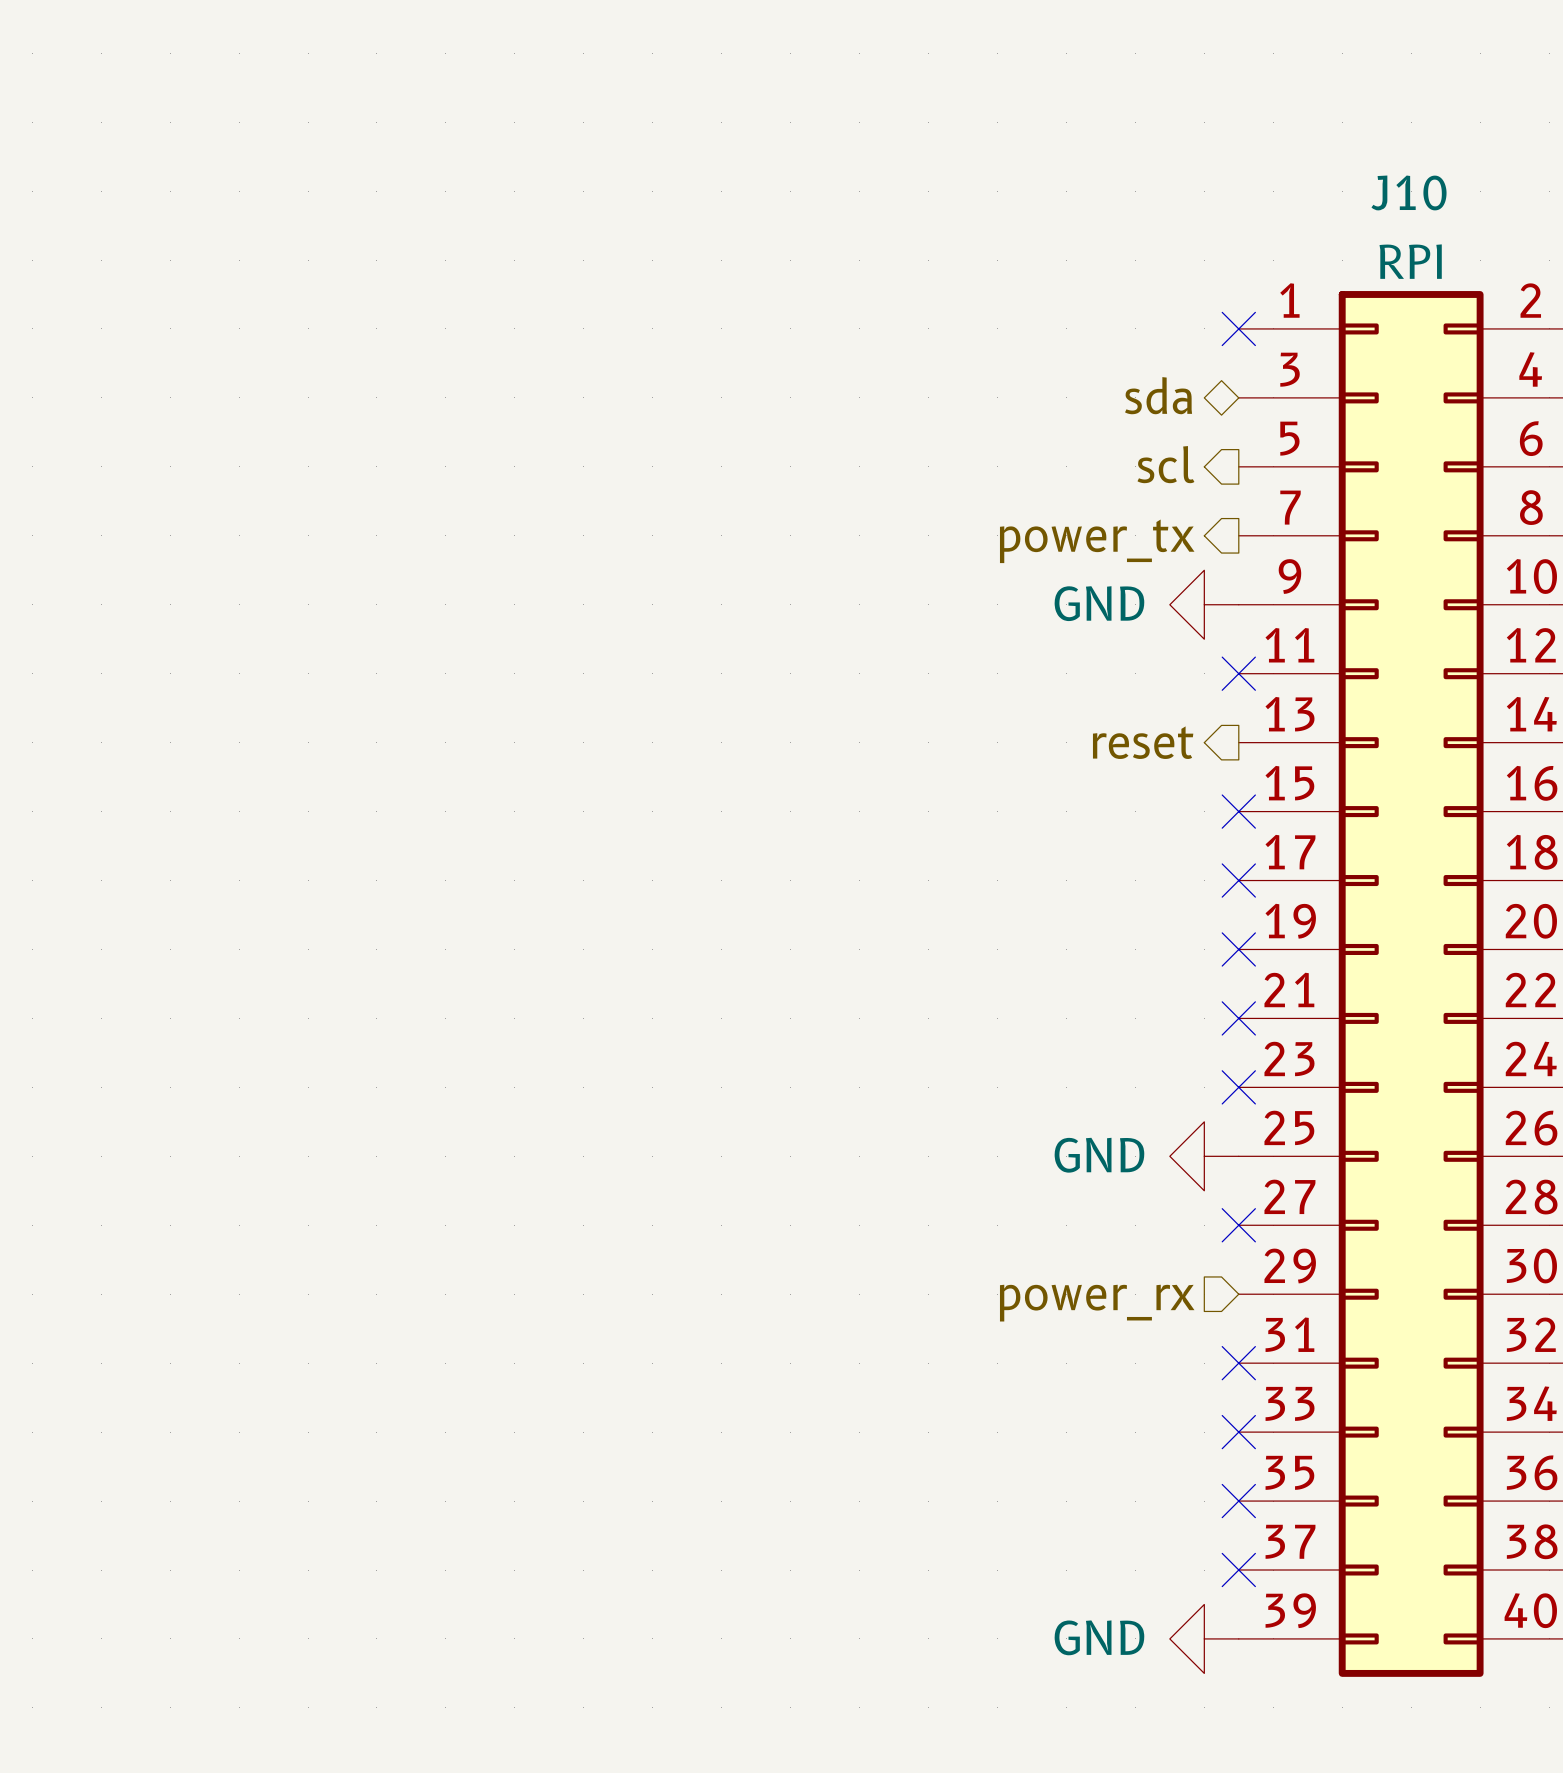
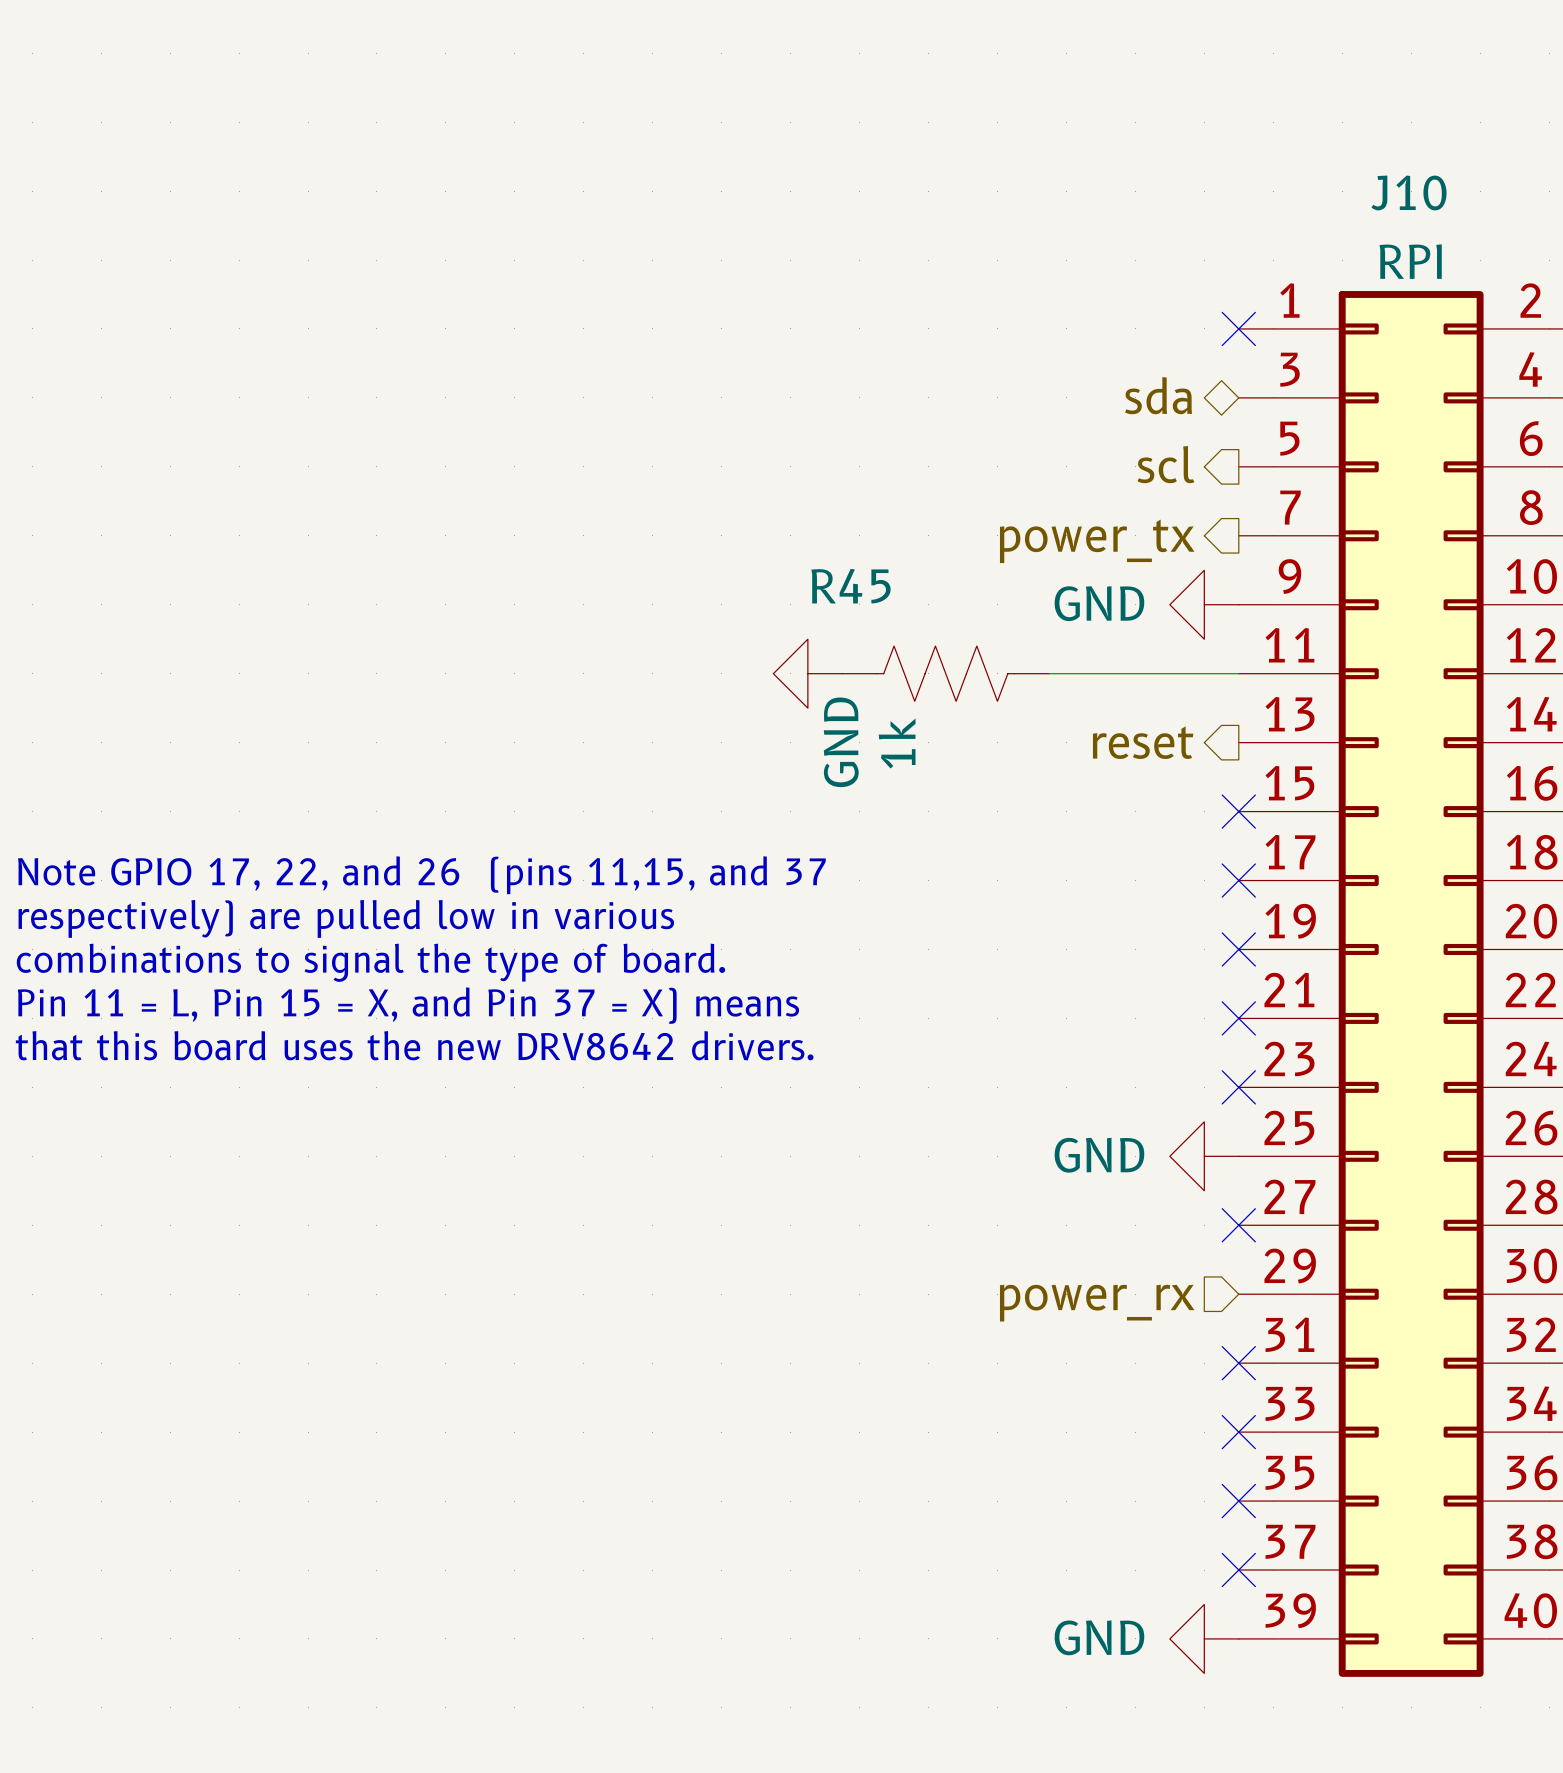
power symbol: none -> GND (807, 673)
R45: none -> 1k (945, 673)
wire: none -> (1049, 673) (1238, 673)
no-connect mark: (1238, 673) -> none
text: none -> Note GPIO 17, 22, and 26 (pins 11,15, and 37 (421, 875)
text: none -> respectively) are pulled low in various (346, 918)
text: none -> combinations to signal the type of board. (370, 962)
text: none -> Pin 11 = L, Pin 15 = X, and Pin 37 = X) means (408, 1005)
text: none -> that this board uses the new DRV8642 drivers. (414, 1045)

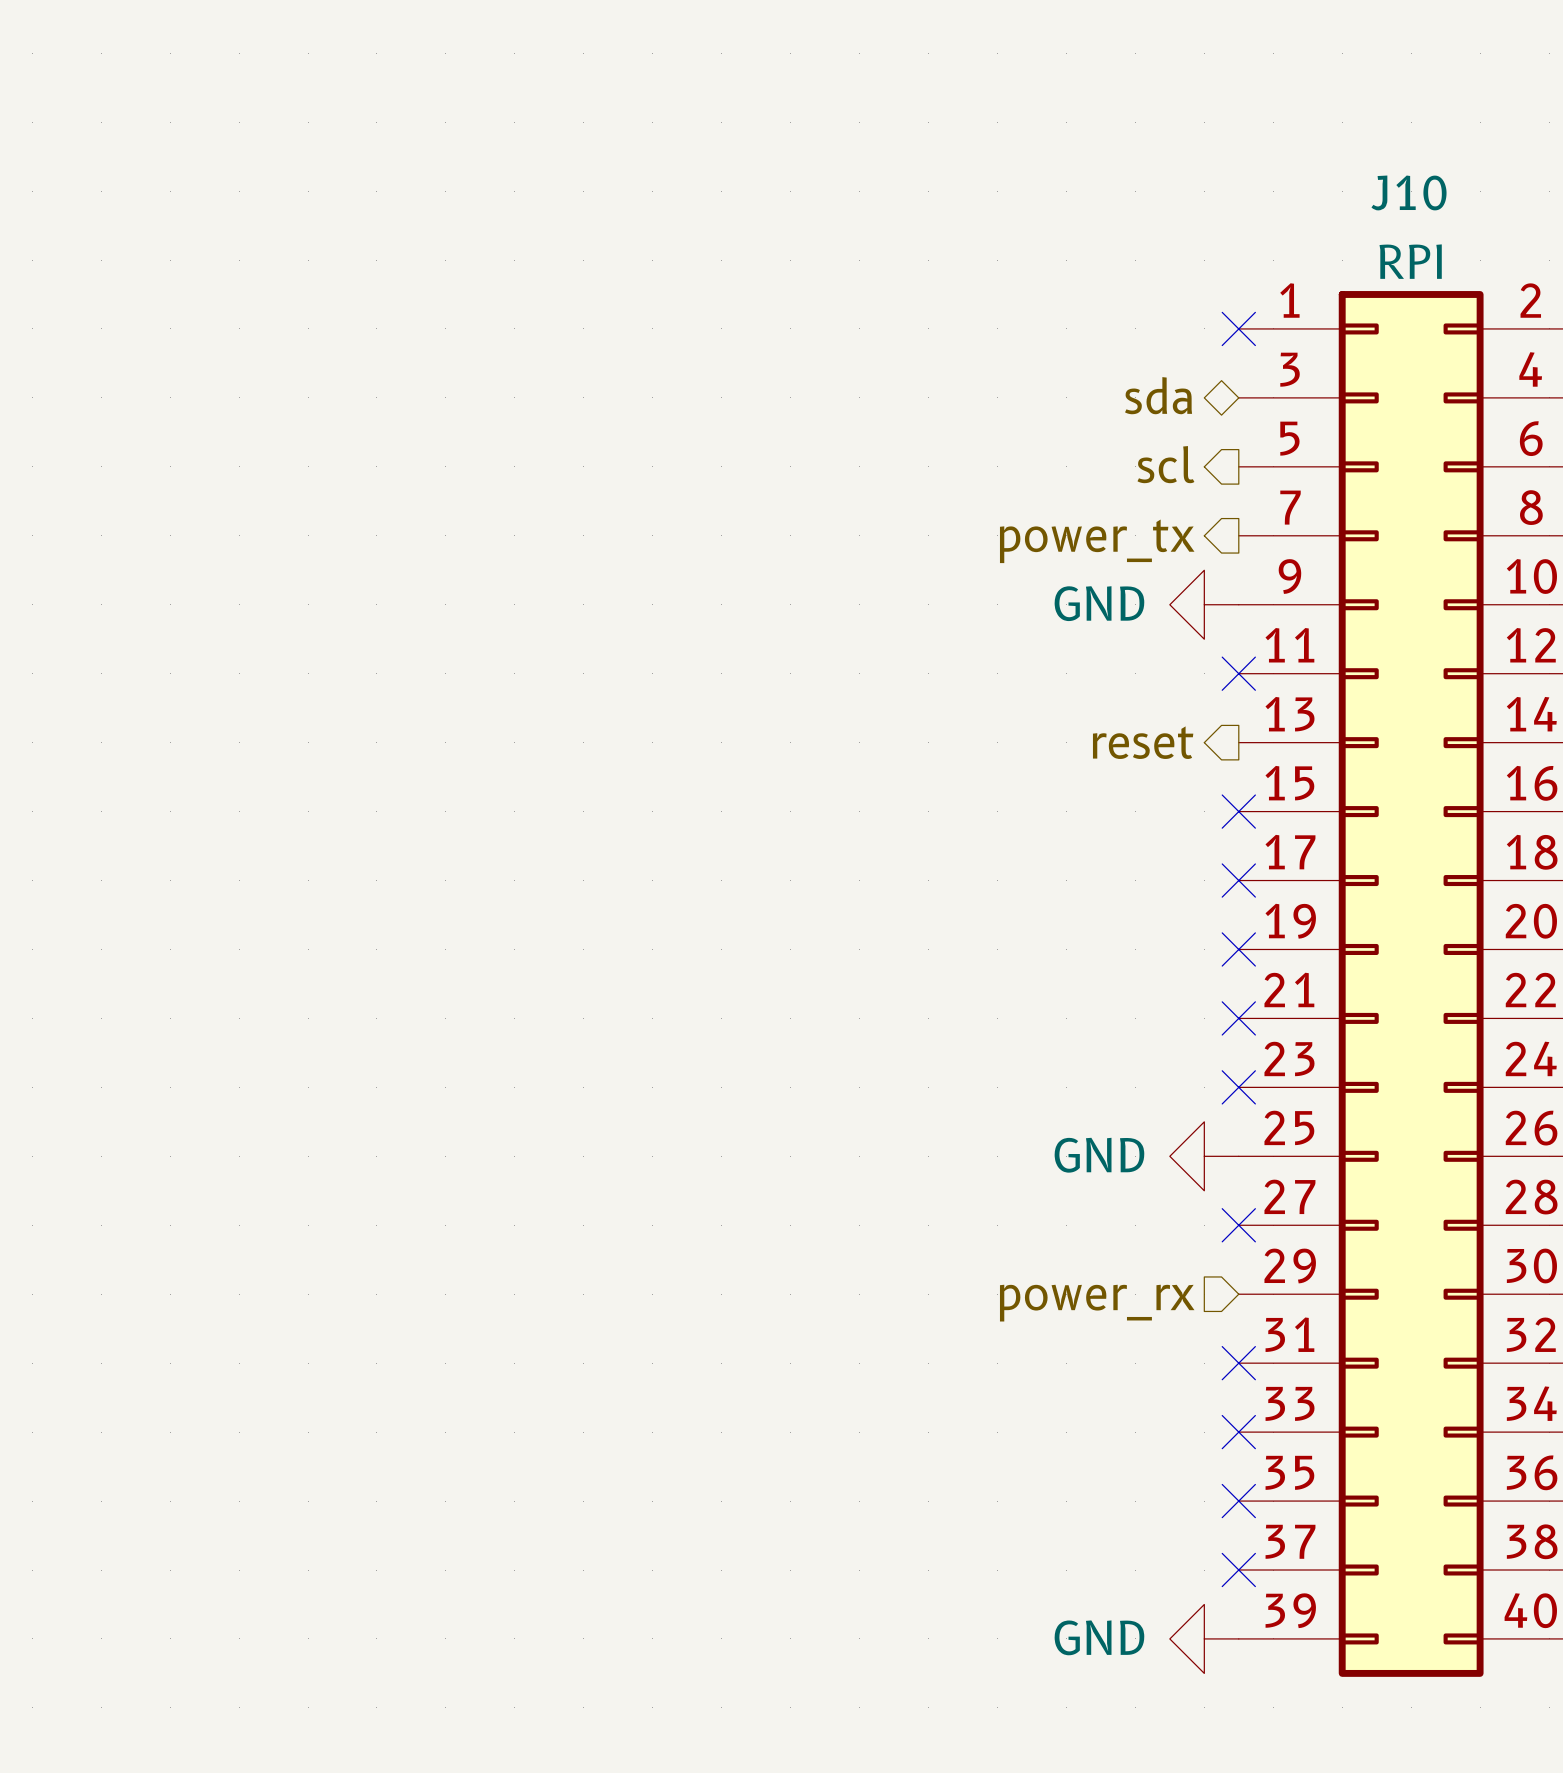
power symbol: GND (807, 673) -> none
R45: 1k (945, 673) -> none
wire: (1049, 673) (1238, 673) -> none
no-connect mark: none -> (1238, 673)
text: Note GPIO 17, 22, and 26 (pins 11,15, and 37 (421, 875) -> none
text: respectively) are pulled low in various (346, 918) -> none
text: combinations to signal the type of board. (370, 962) -> none
text: Pin 11 = L, Pin 15 = X, and Pin 37 = X) means (408, 1005) -> none
text: that this board uses the new DRV8642 drivers. (414, 1045) -> none

